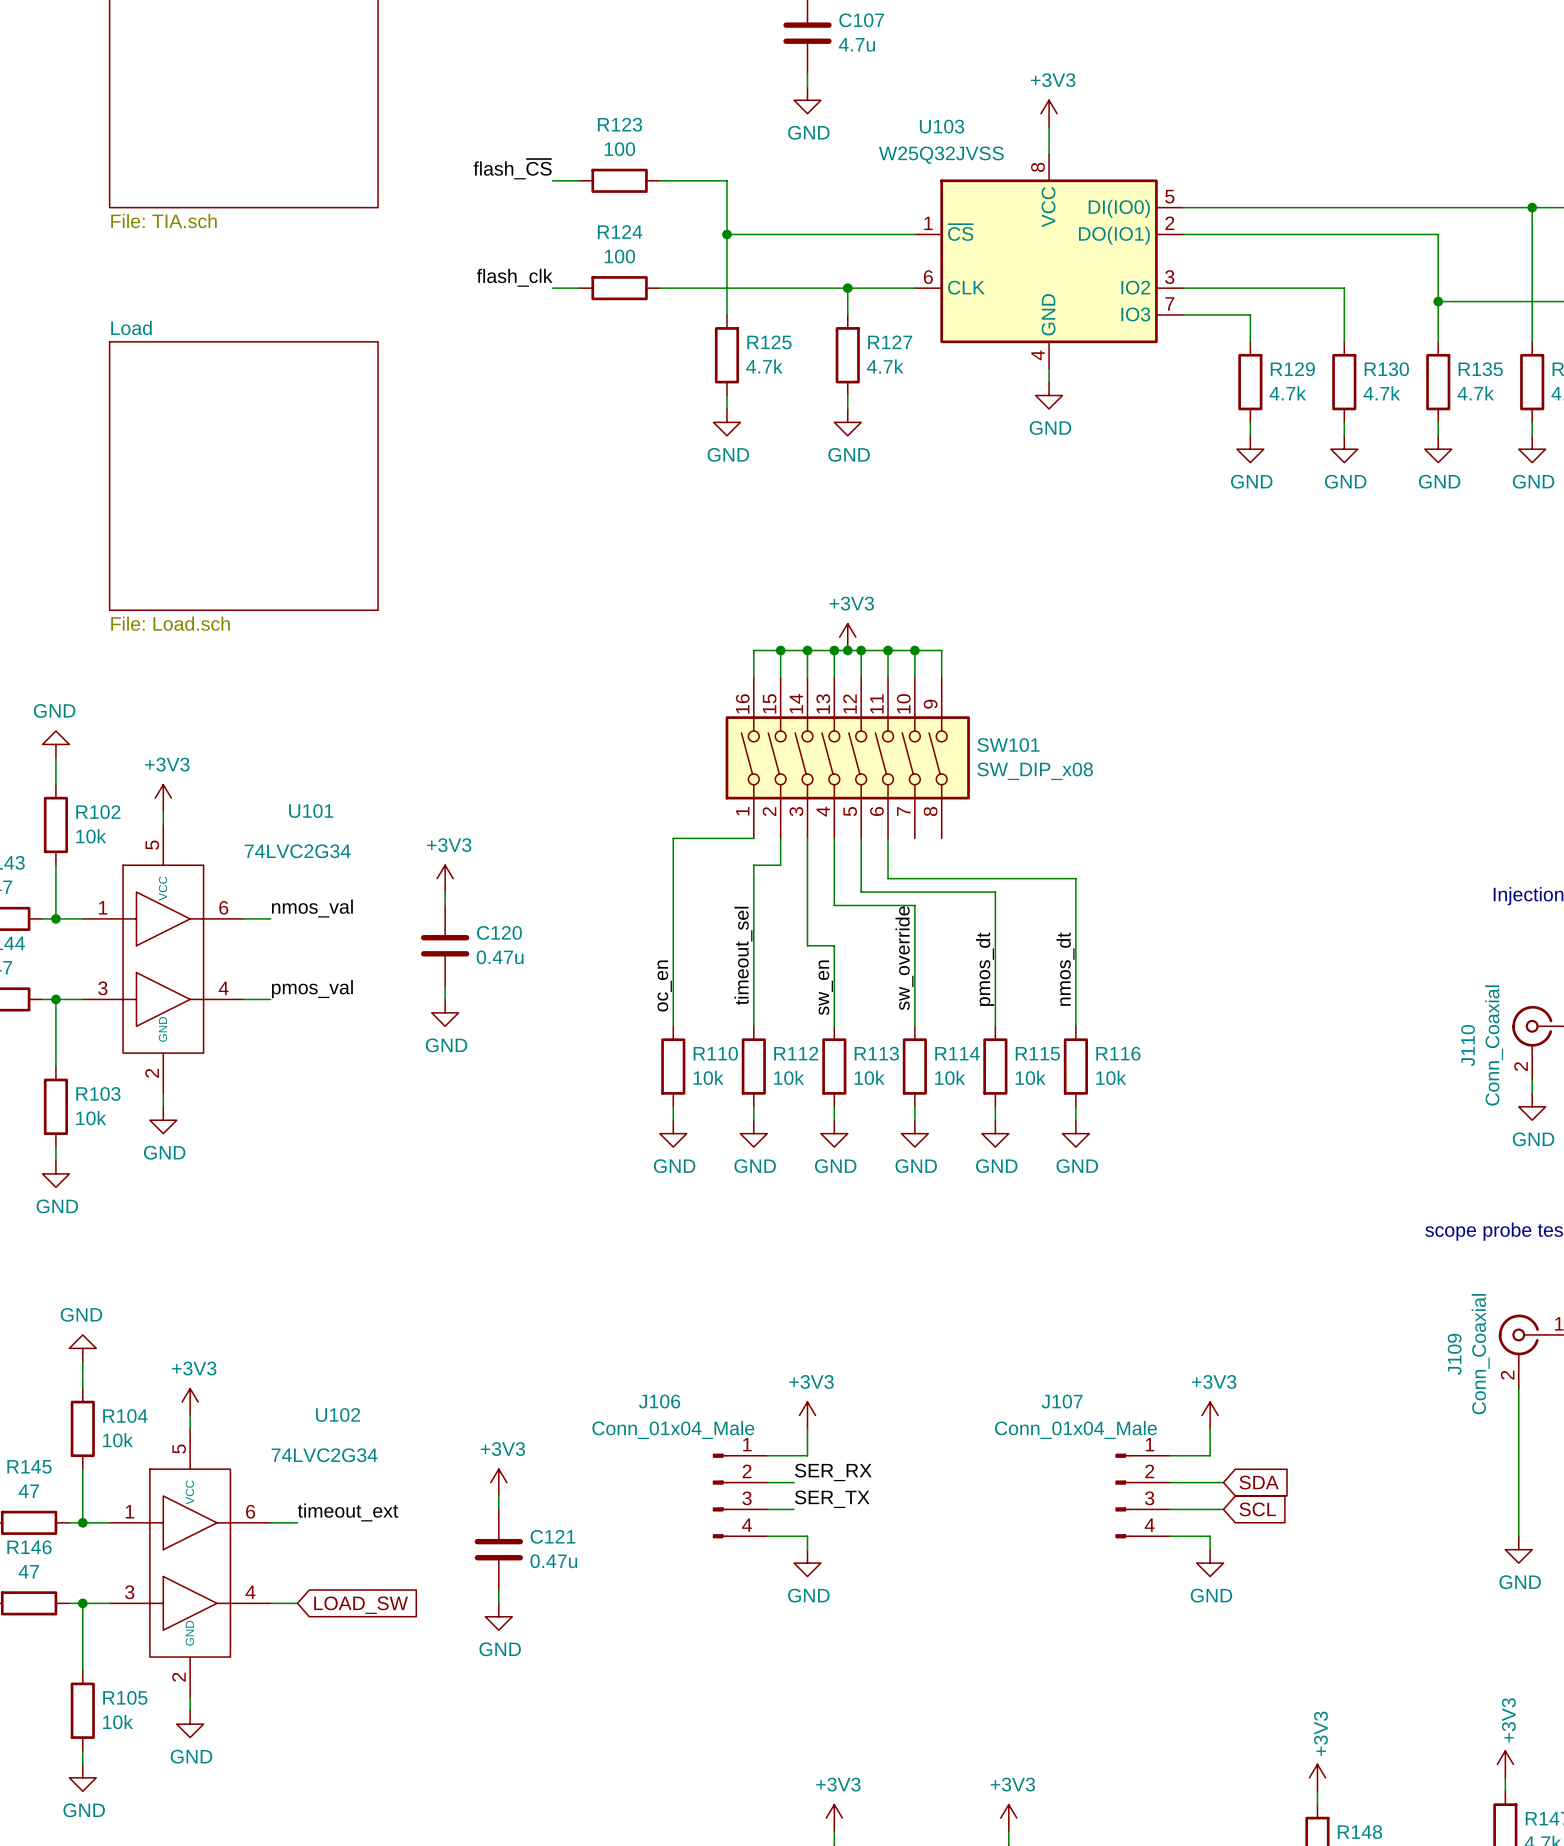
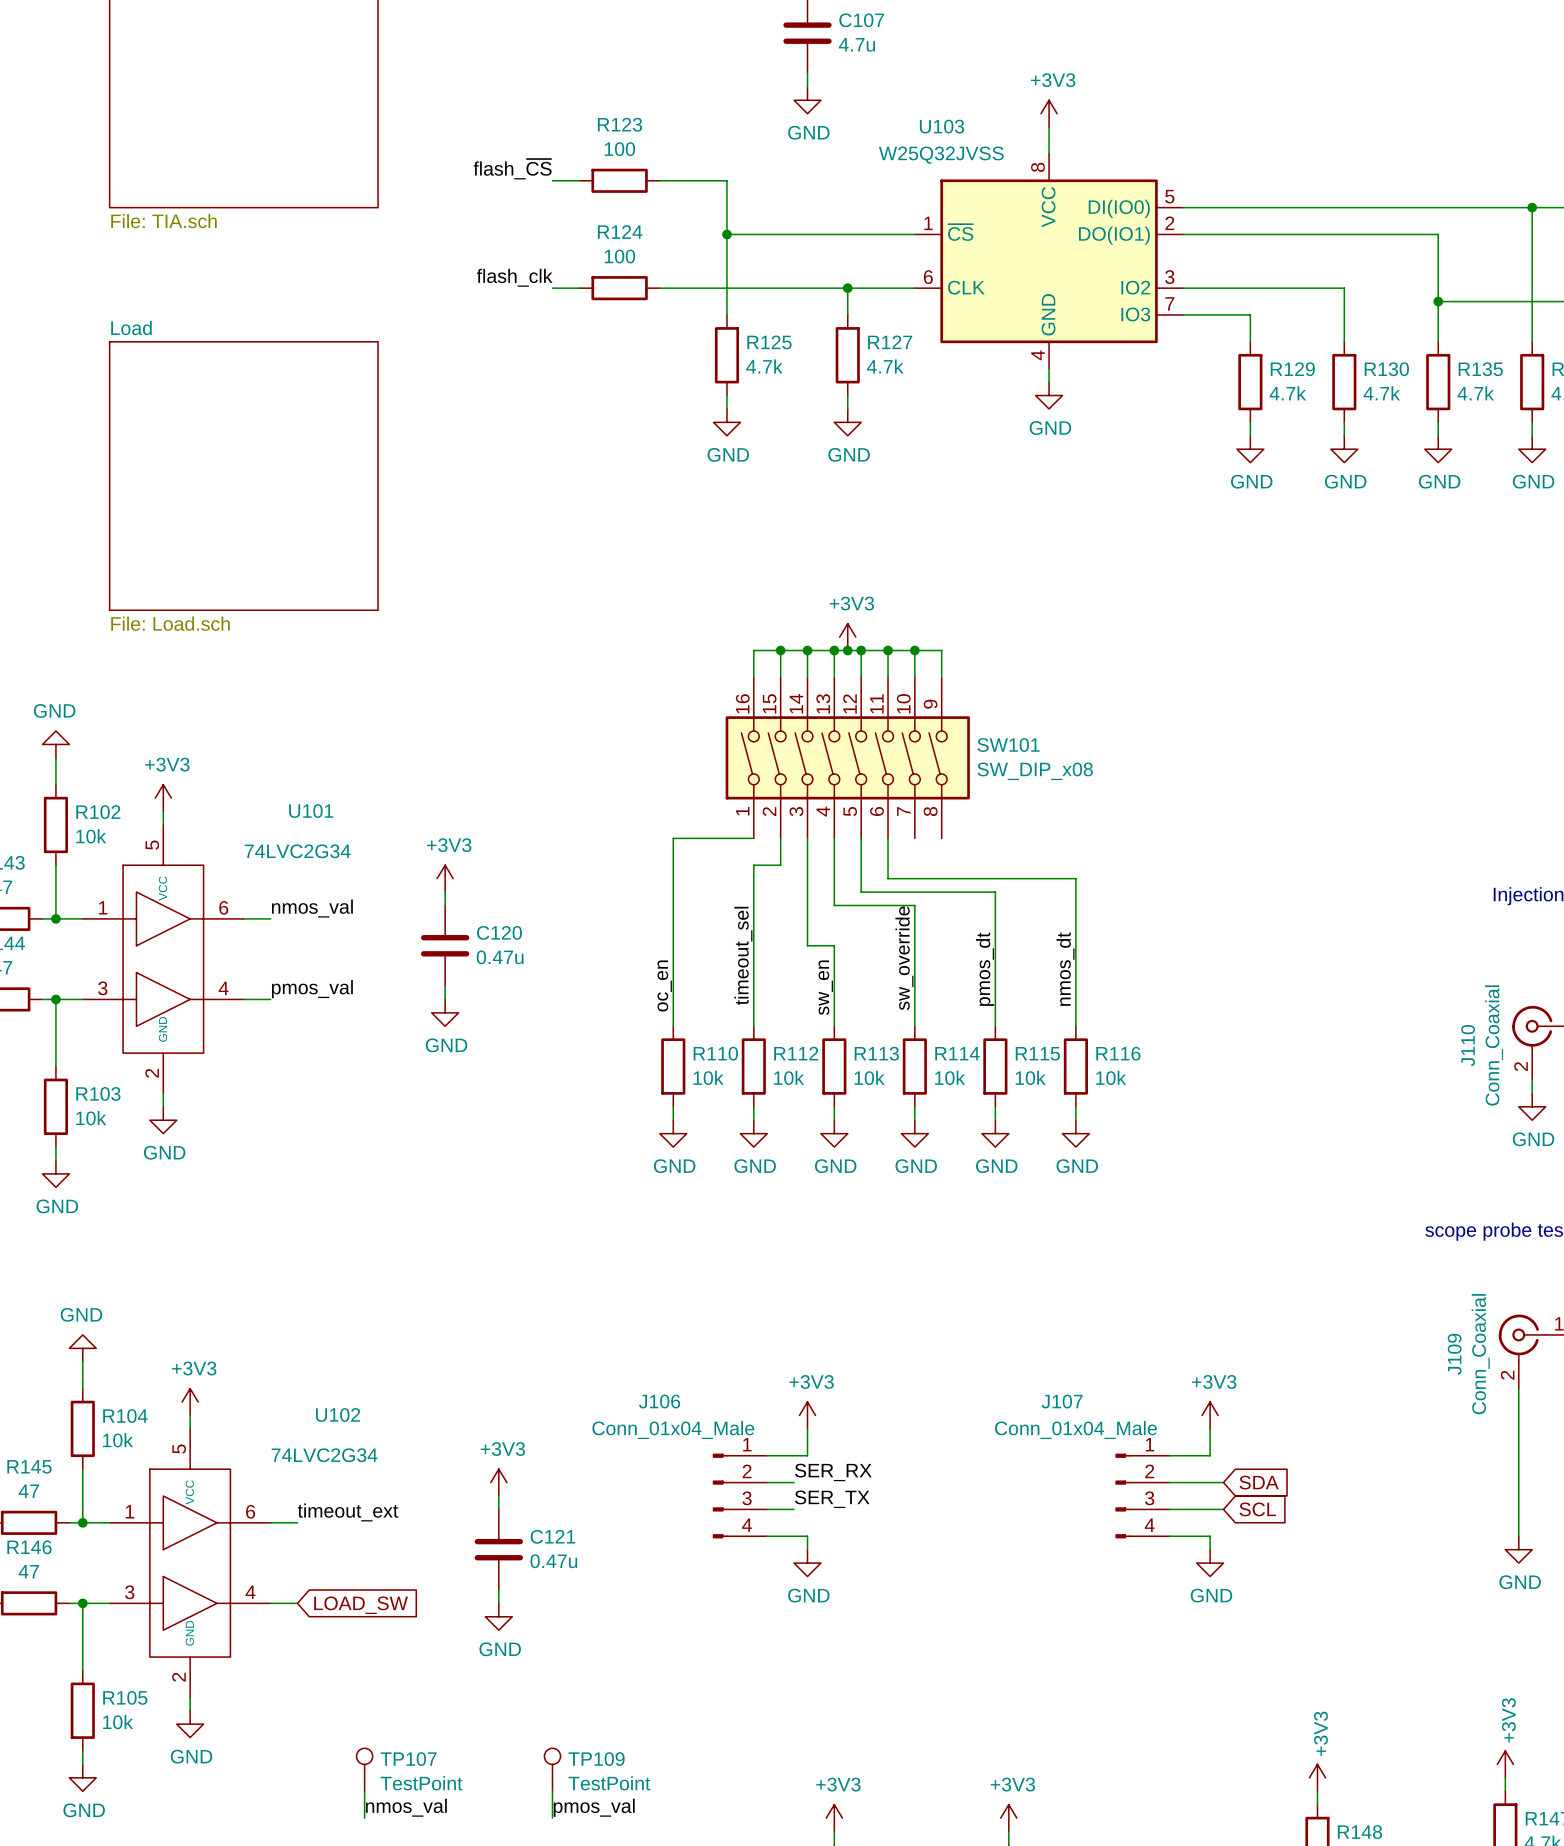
TP107: none -> TestPoint (364, 1769)
TP109: none -> TestPoint (552, 1769)
wire: none -> (364, 1791) (364, 1818)
wire: none -> (552, 1791) (552, 1818)
label: none -> nmos_val (406, 1807)
label: none -> pmos_val (594, 1807)

